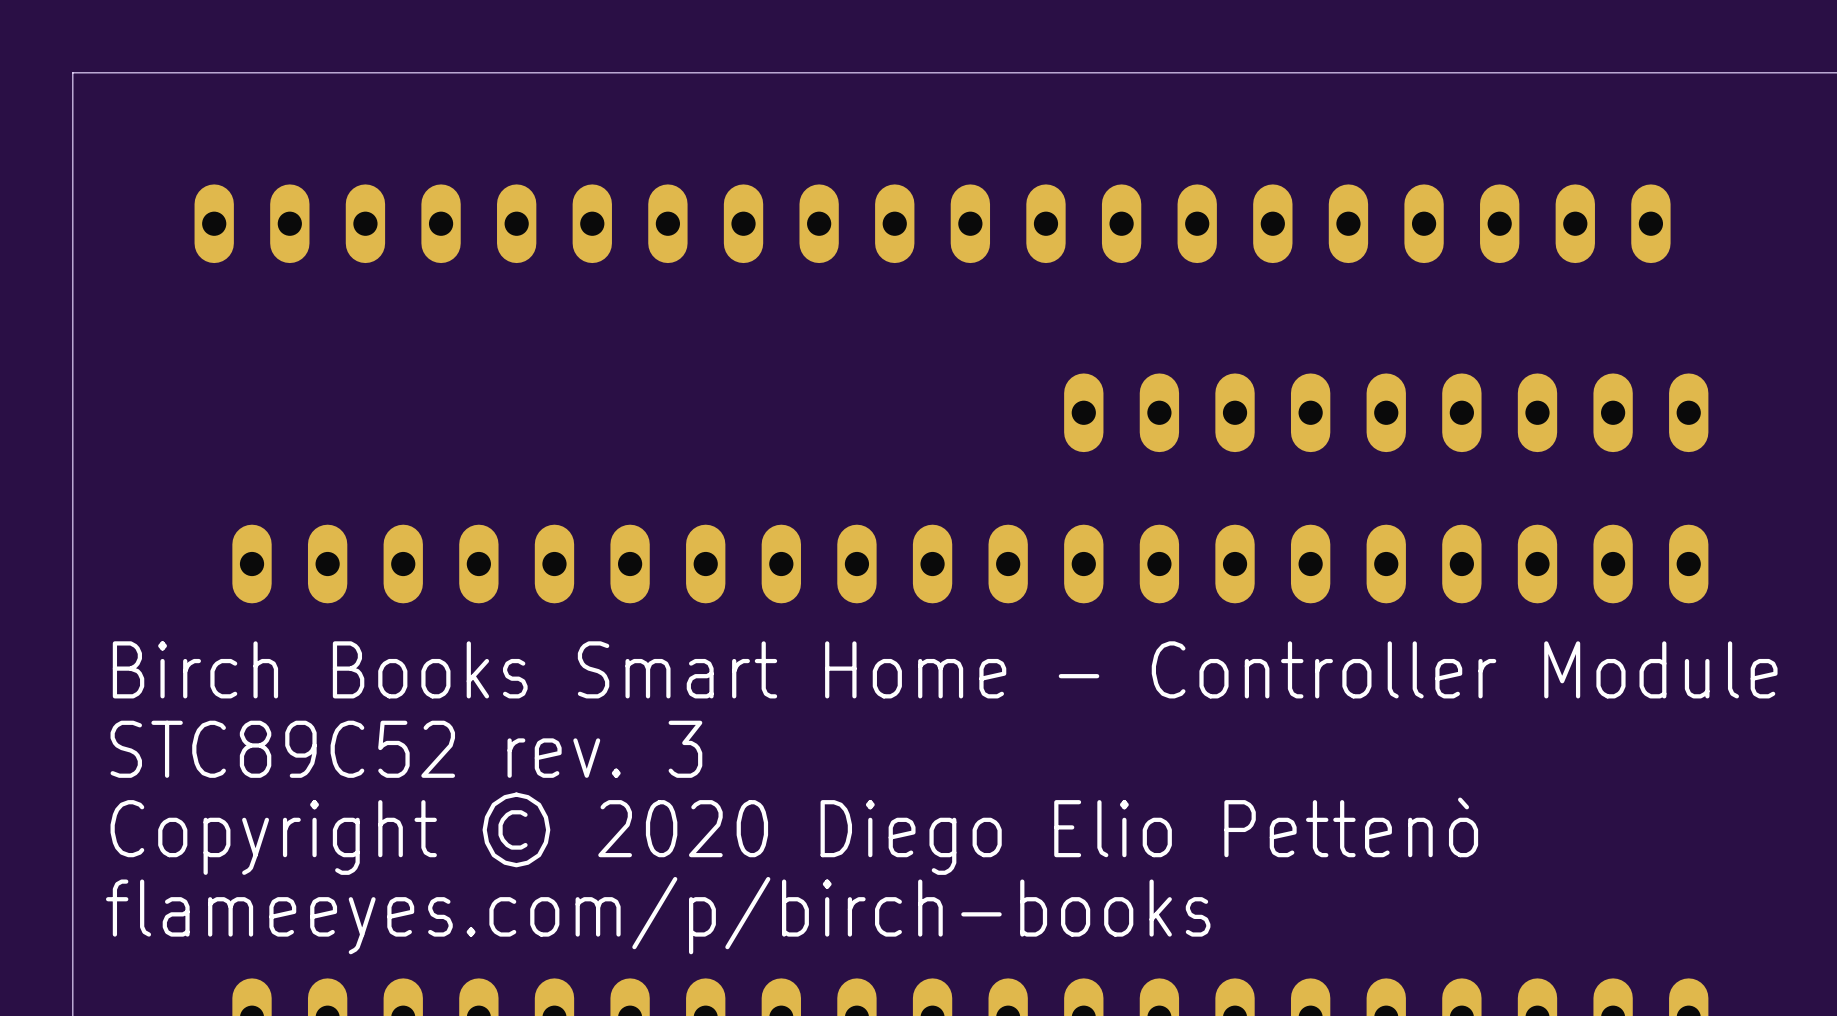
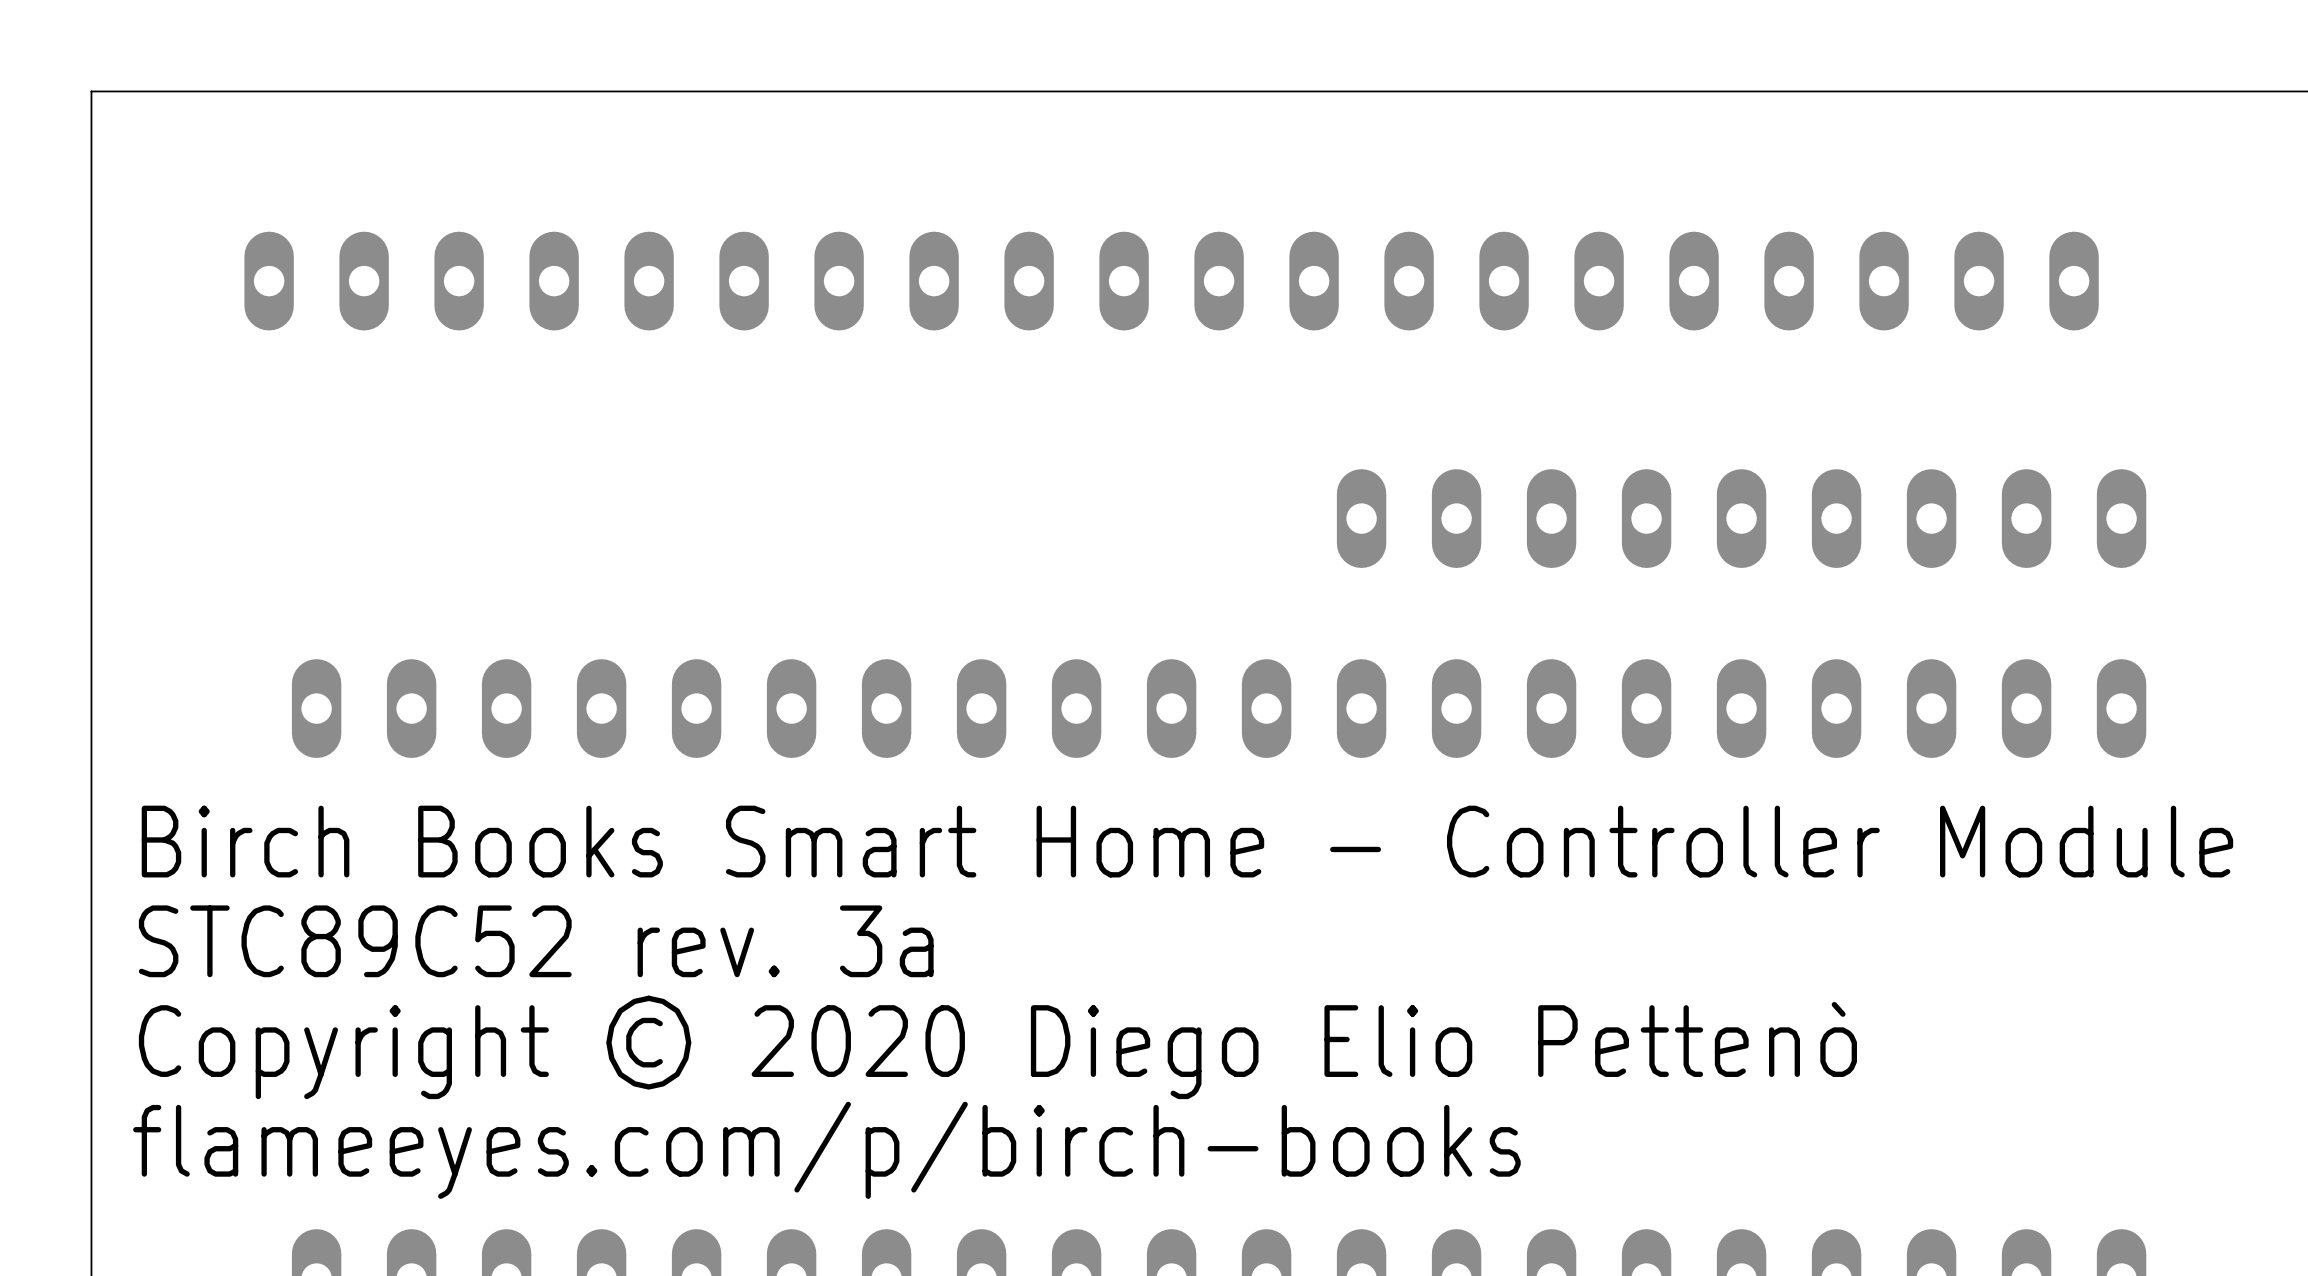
text: STC89C52 rev. 3 (406, 749) -> STC89C52 rev. 3a (536, 941)

